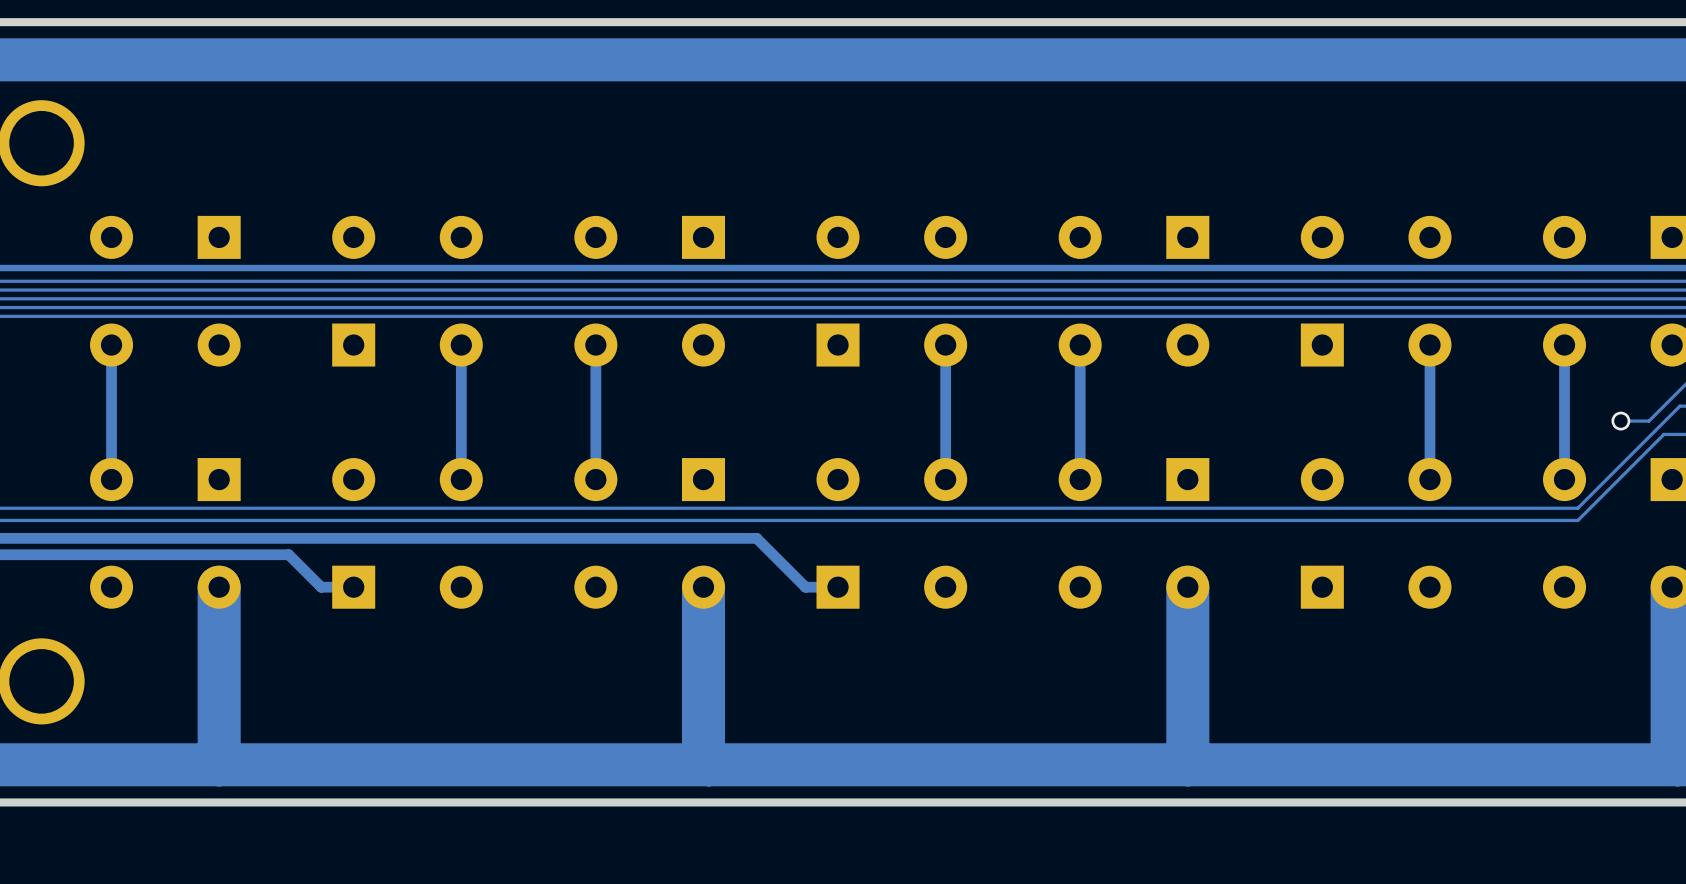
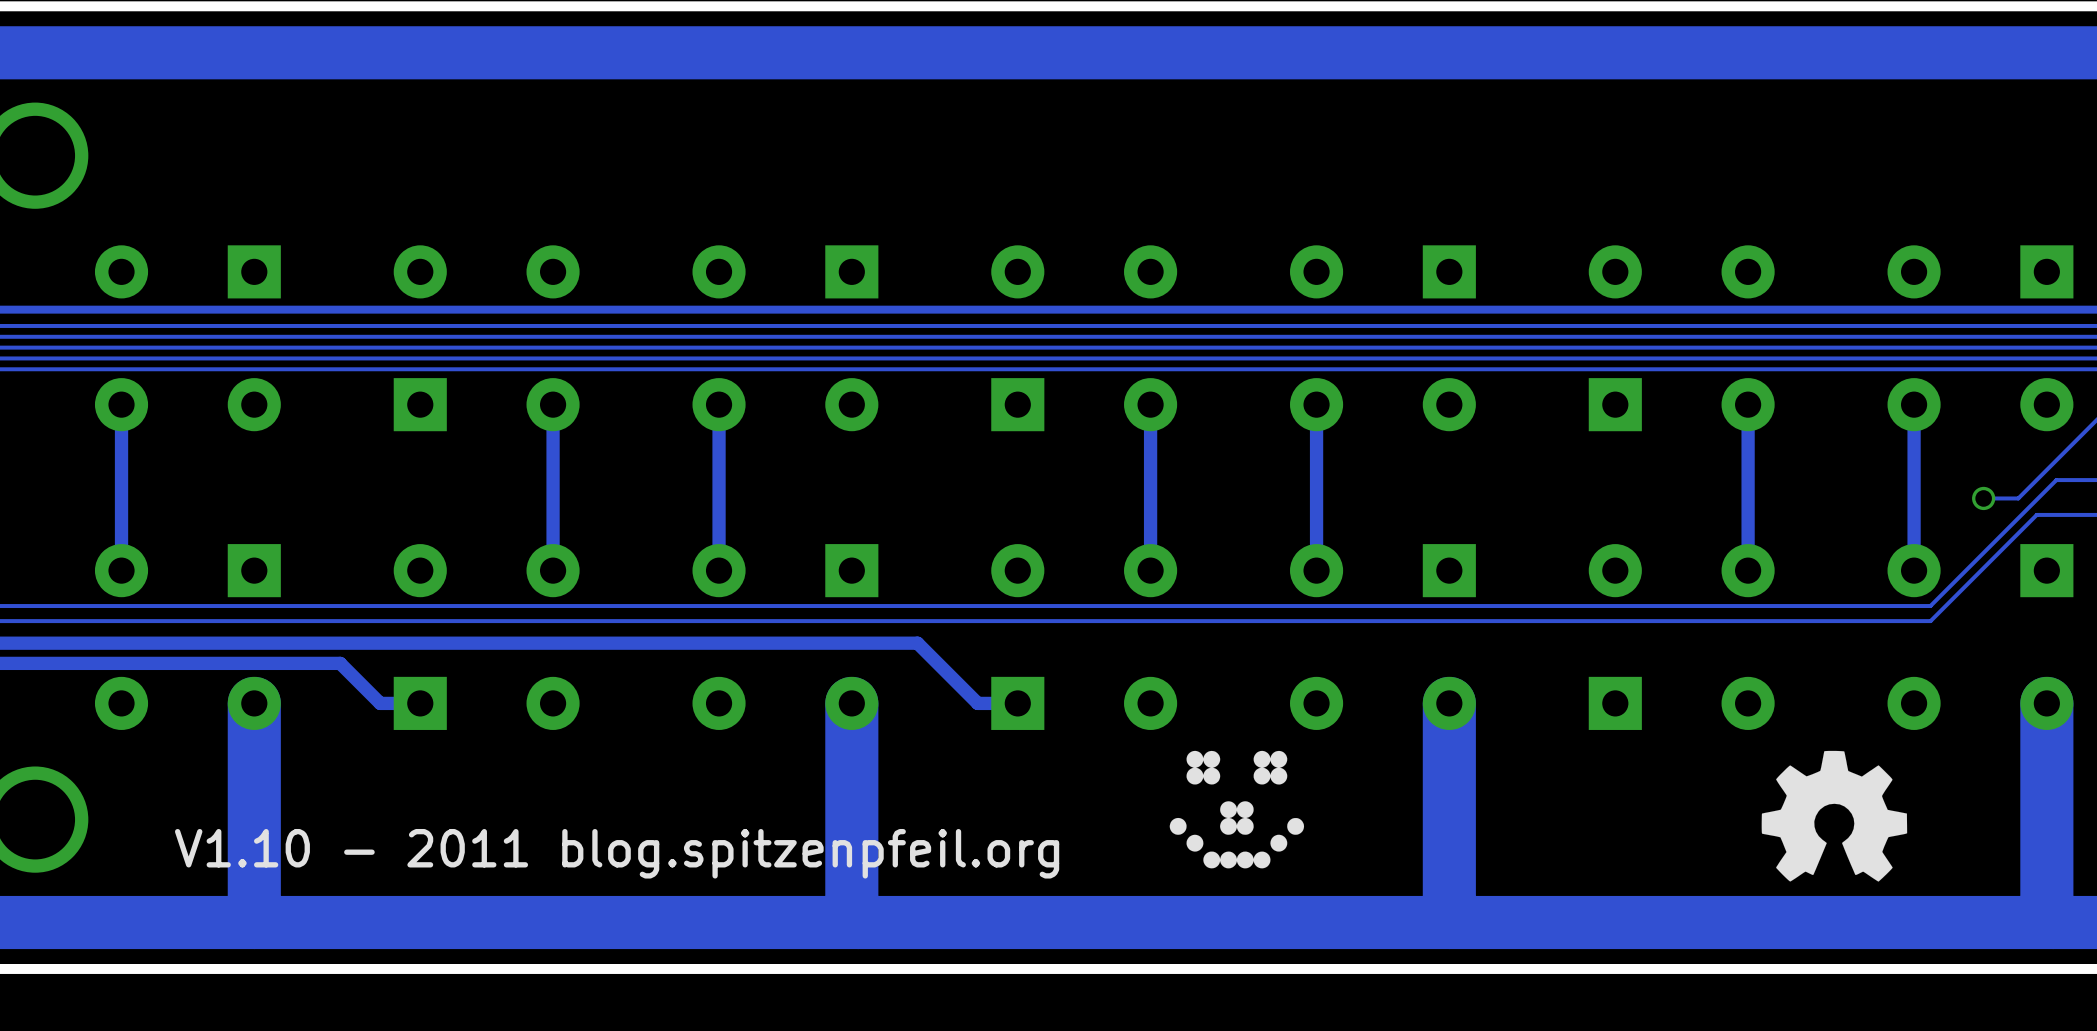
drawing: none -> [1169, 750, 1305, 869]
drawing: none -> [1761, 750, 1908, 882]
text: none -> V1.10 - 2011 blog.spitzenpfeil.org (617, 853)

